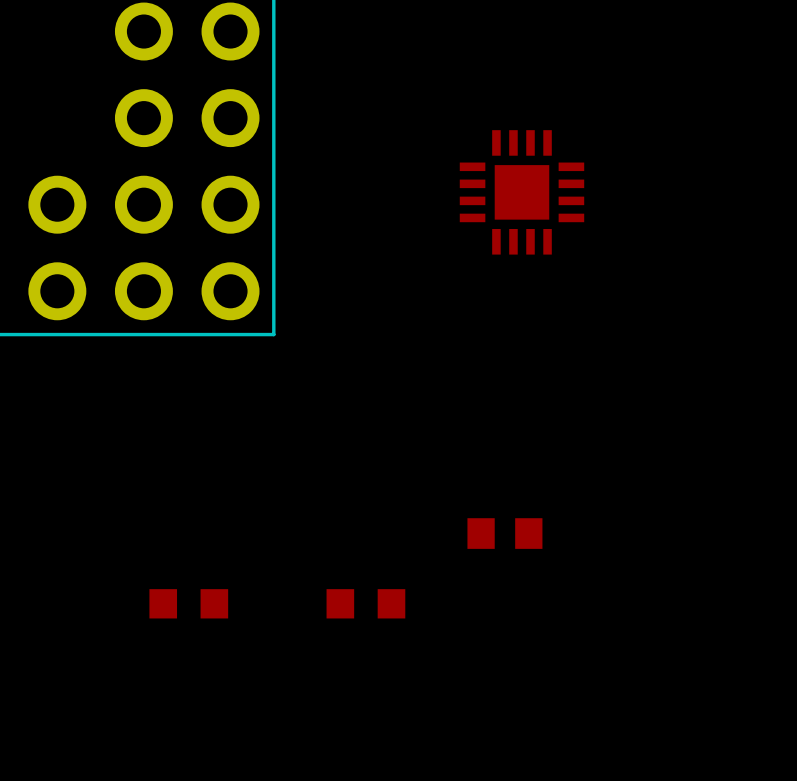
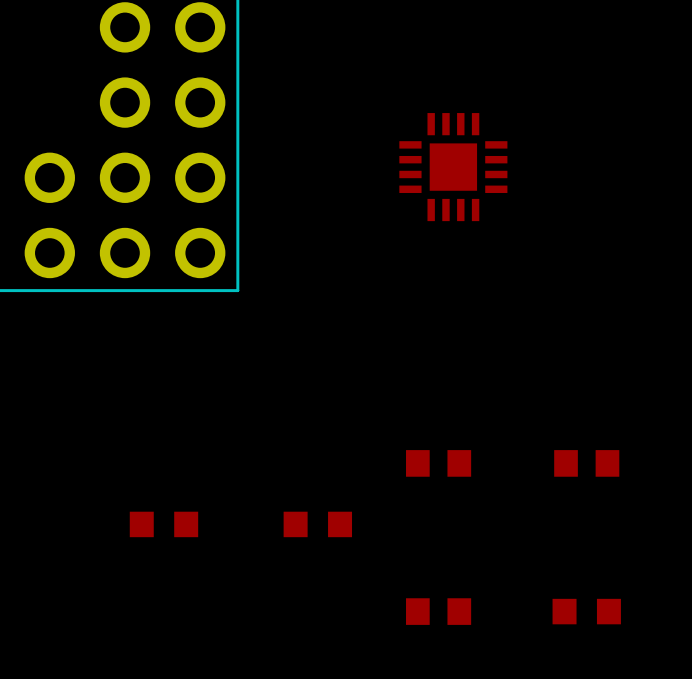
part: none -> (586, 463)
part: none -> (438, 611)
part: none -> (586, 611)

